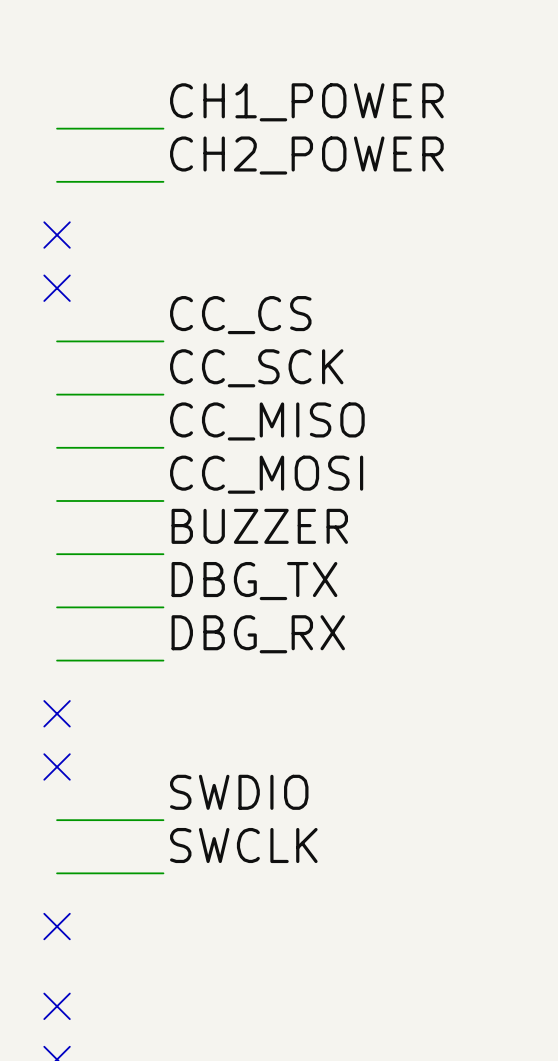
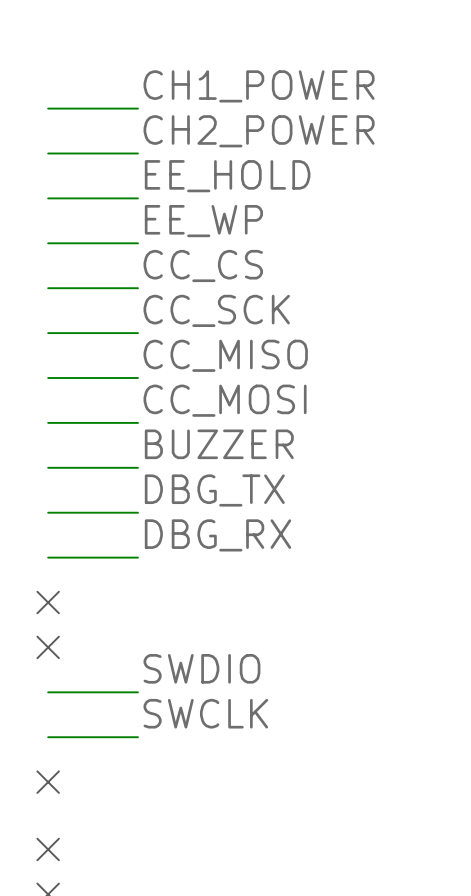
label: none -> EE_HOLD (227, 176)
wire: none -> (48, 198) (137, 198)
no-connect mark: (57, 235) -> none
label: none -> EE_WP (203, 221)
wire: none -> (48, 243) (137, 243)
no-connect mark: (57, 288) -> none

